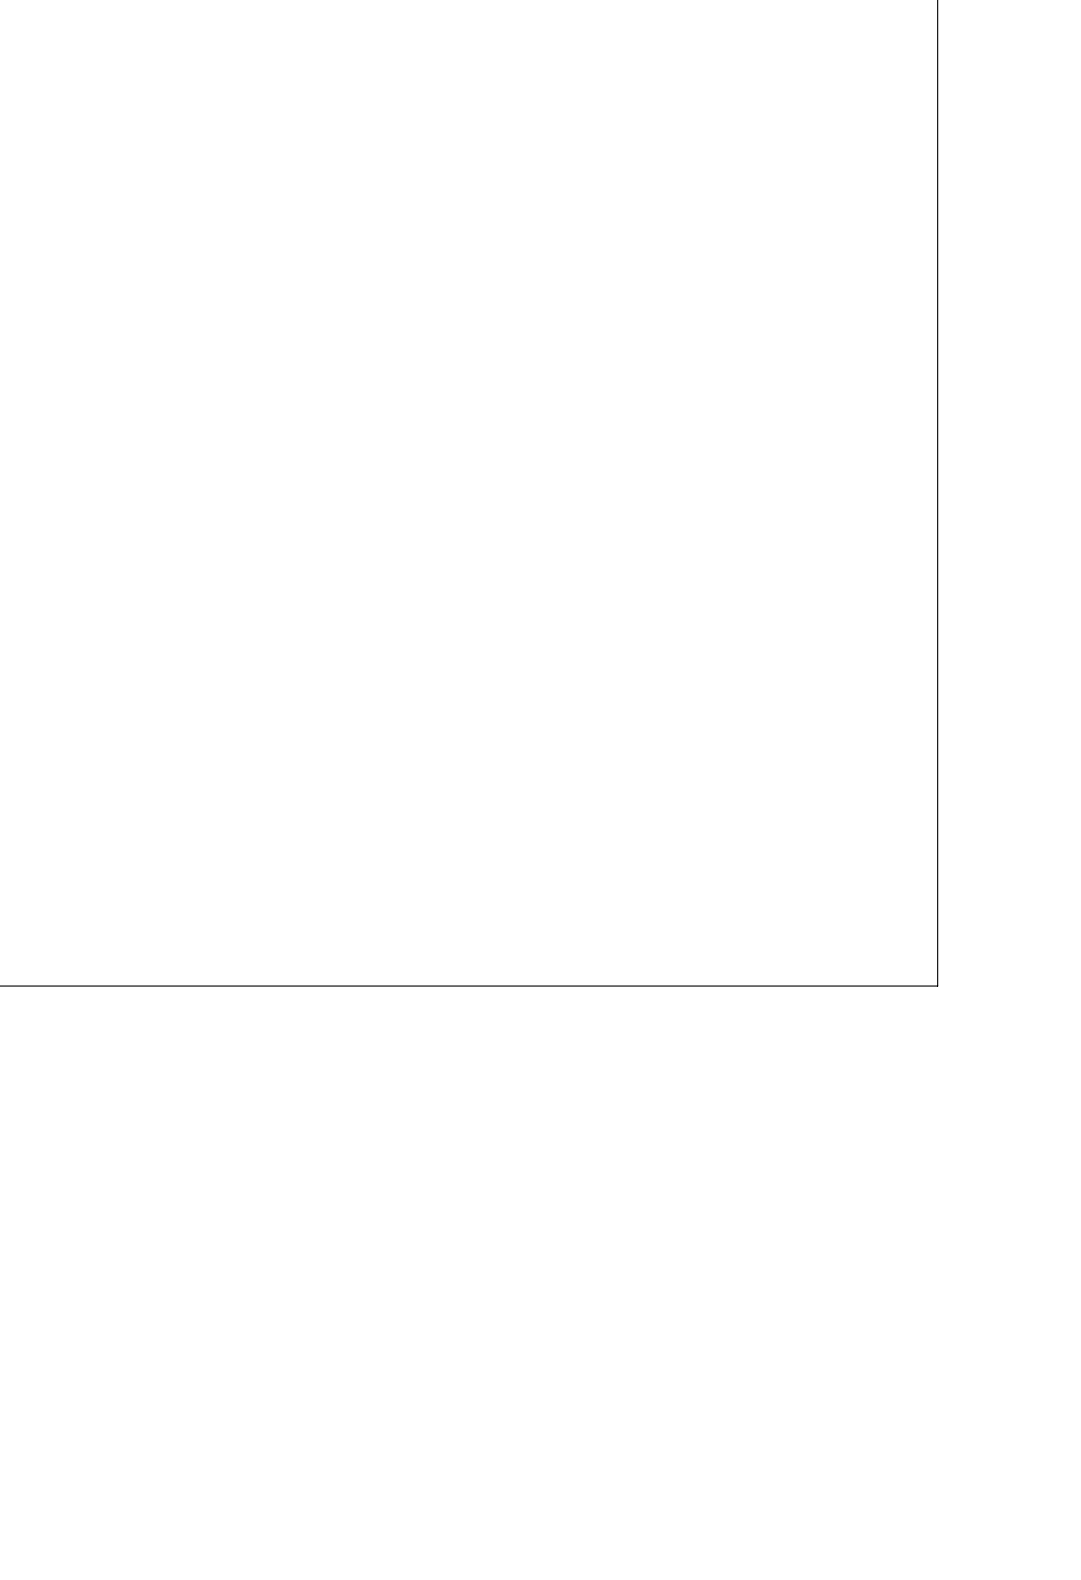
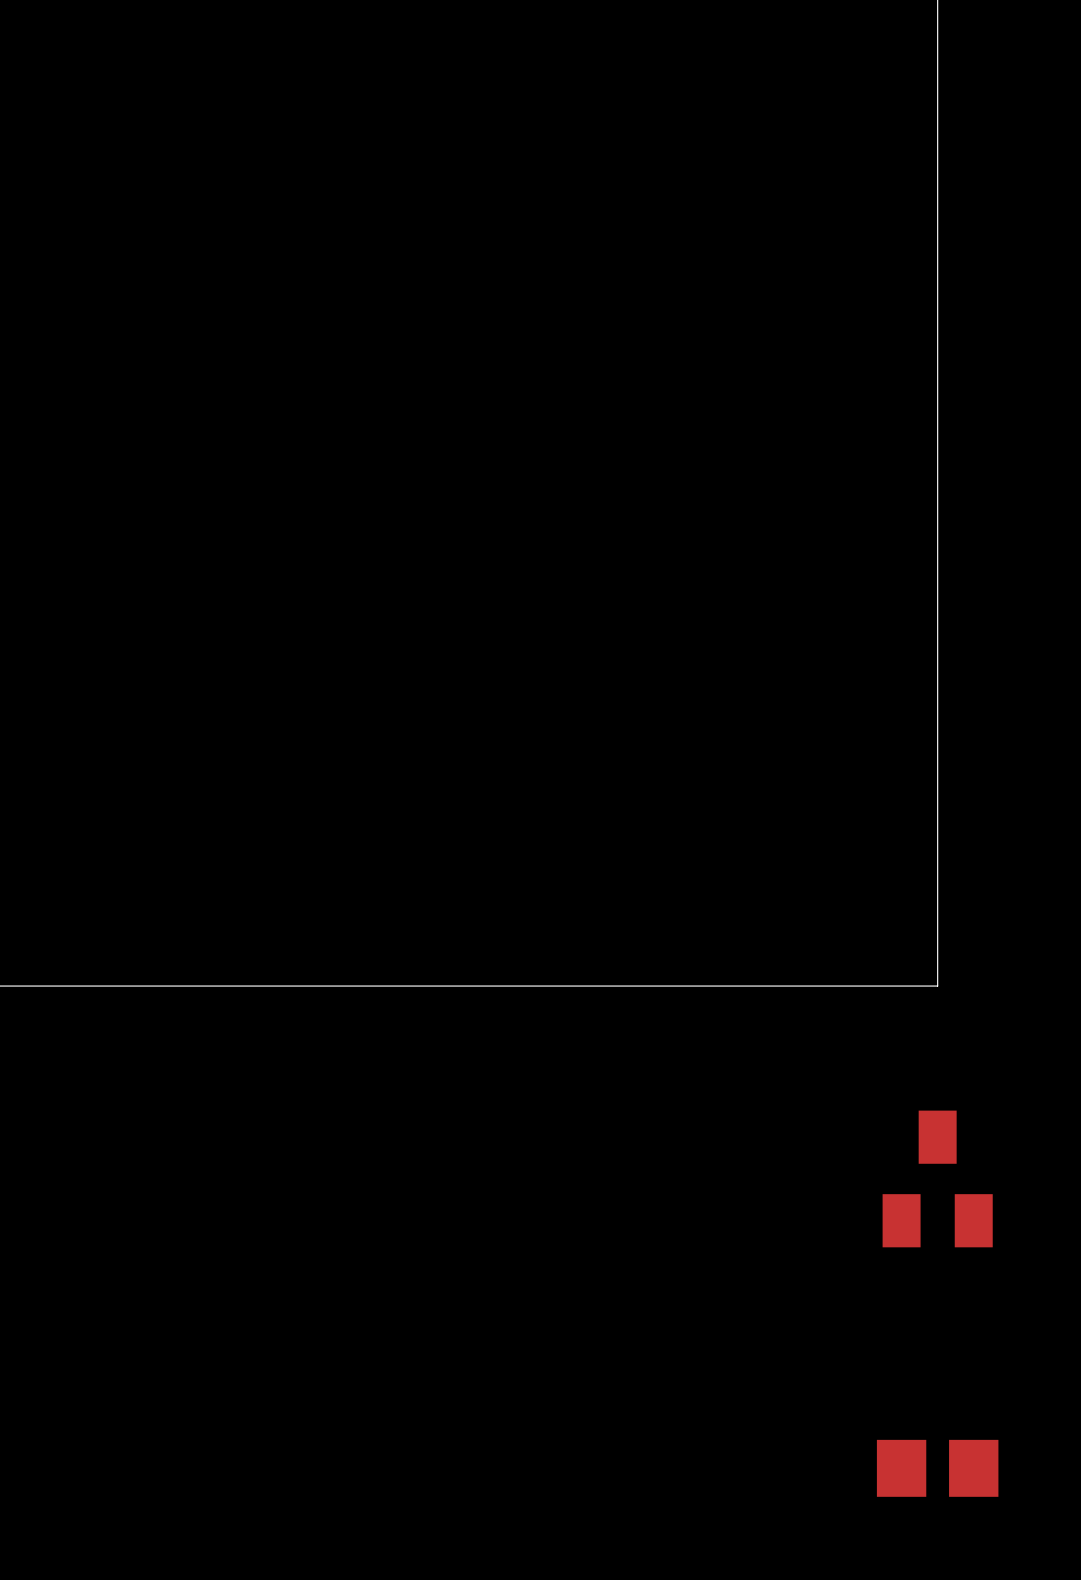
part: none -> (937, 1178)
part: none -> (937, 1468)

